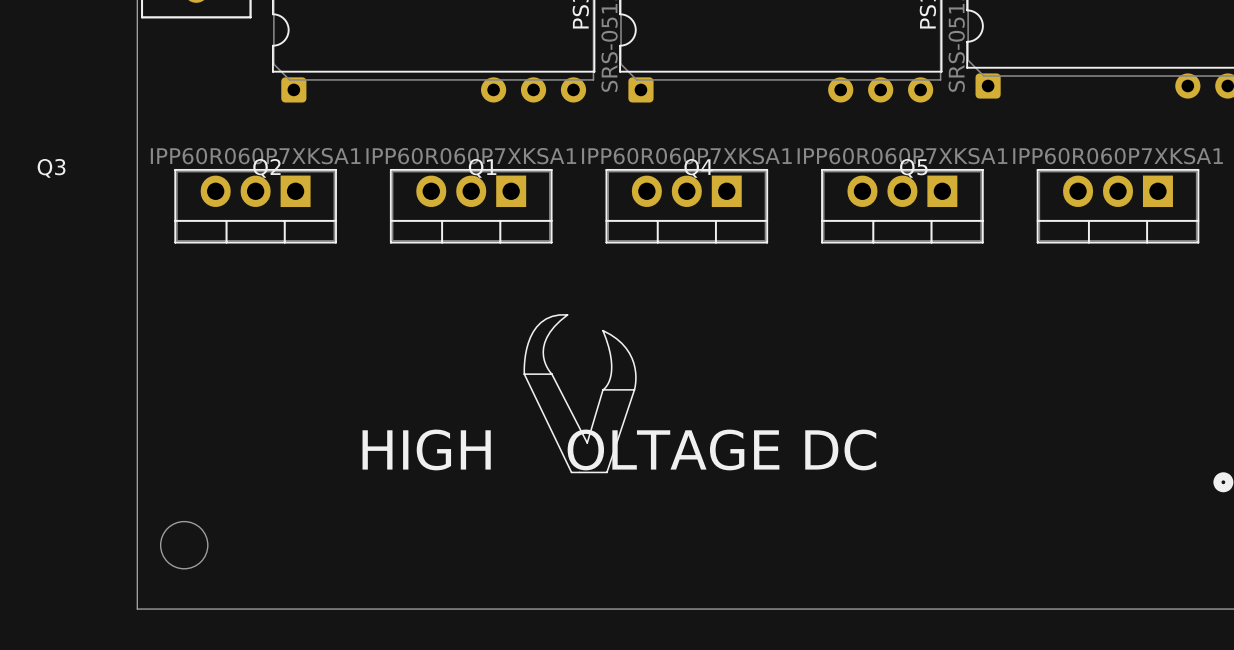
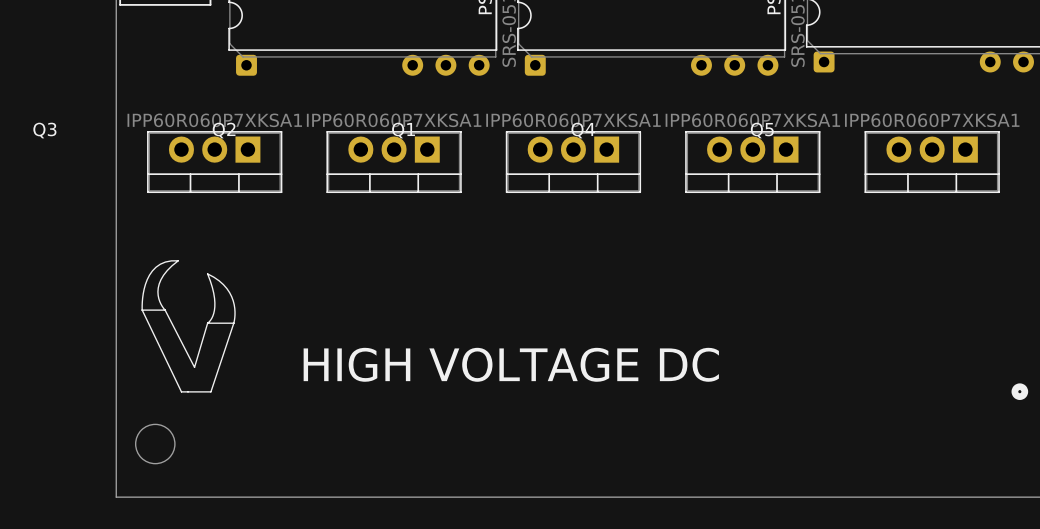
line: (524, 374) (551, 374) -> (142, 310) (165, 310)
line: (524, 374) (571, 472) (606, 472) (634, 389) -> (142, 310) (181, 391) (210, 391) (233, 323)
line: (524, 374) (526, 348) (536, 327) (552, 316) (567, 314) (554, 326) (544, 342) (544, 360) (551, 374) -> (142, 310) (144, 289) (152, 270) (165, 262) (178, 260) (167, 270) (159, 283) (158, 298) (165, 310)
line: (551, 374) (587, 442) (602, 389) -> (165, 310) (194, 367) (207, 323)
line: (602, 389) (634, 389) -> (207, 323) (233, 323)
line: (602, 389) (609, 381) (611, 365) (608, 346) (602, 330) (616, 338) (629, 353) (635, 372) (634, 389) -> (207, 323) (212, 315) (214, 302) (207, 273) (219, 280) (229, 292) (234, 308) (233, 323)
text: HIGH OLTAGE DC (619, 449) -> HIGH VOLTAGE DC (511, 364)

